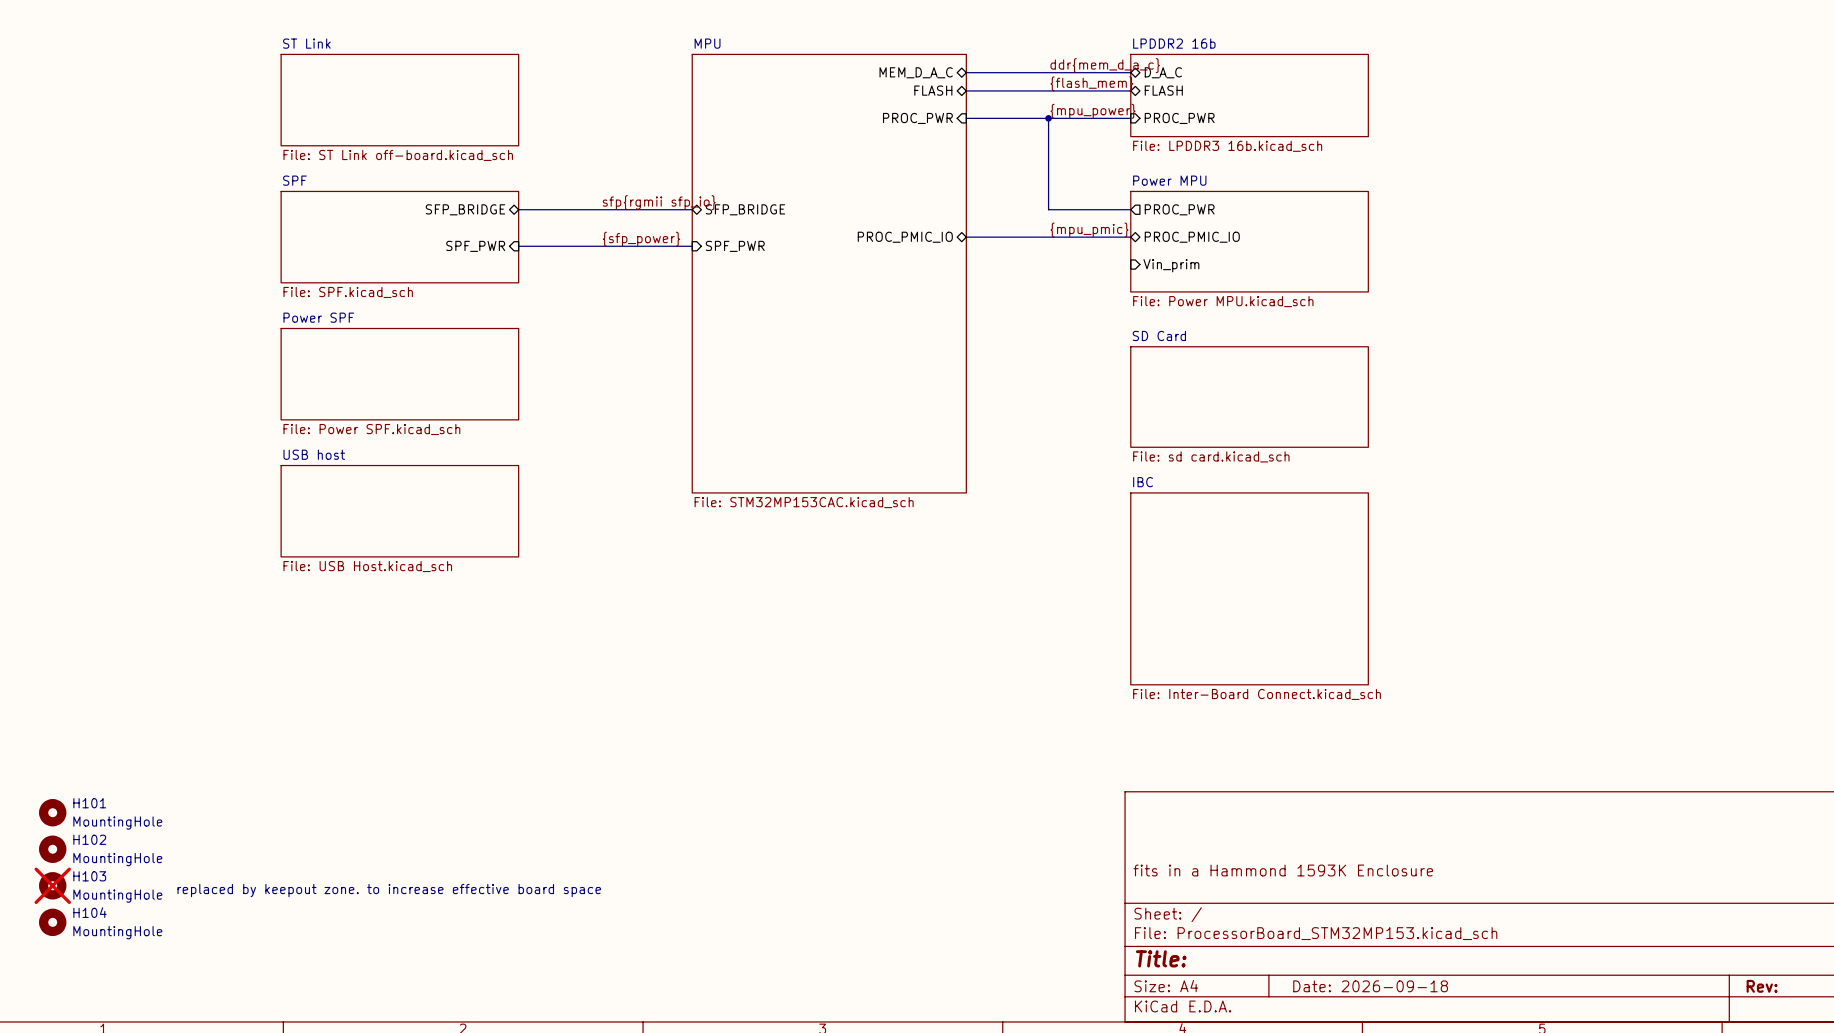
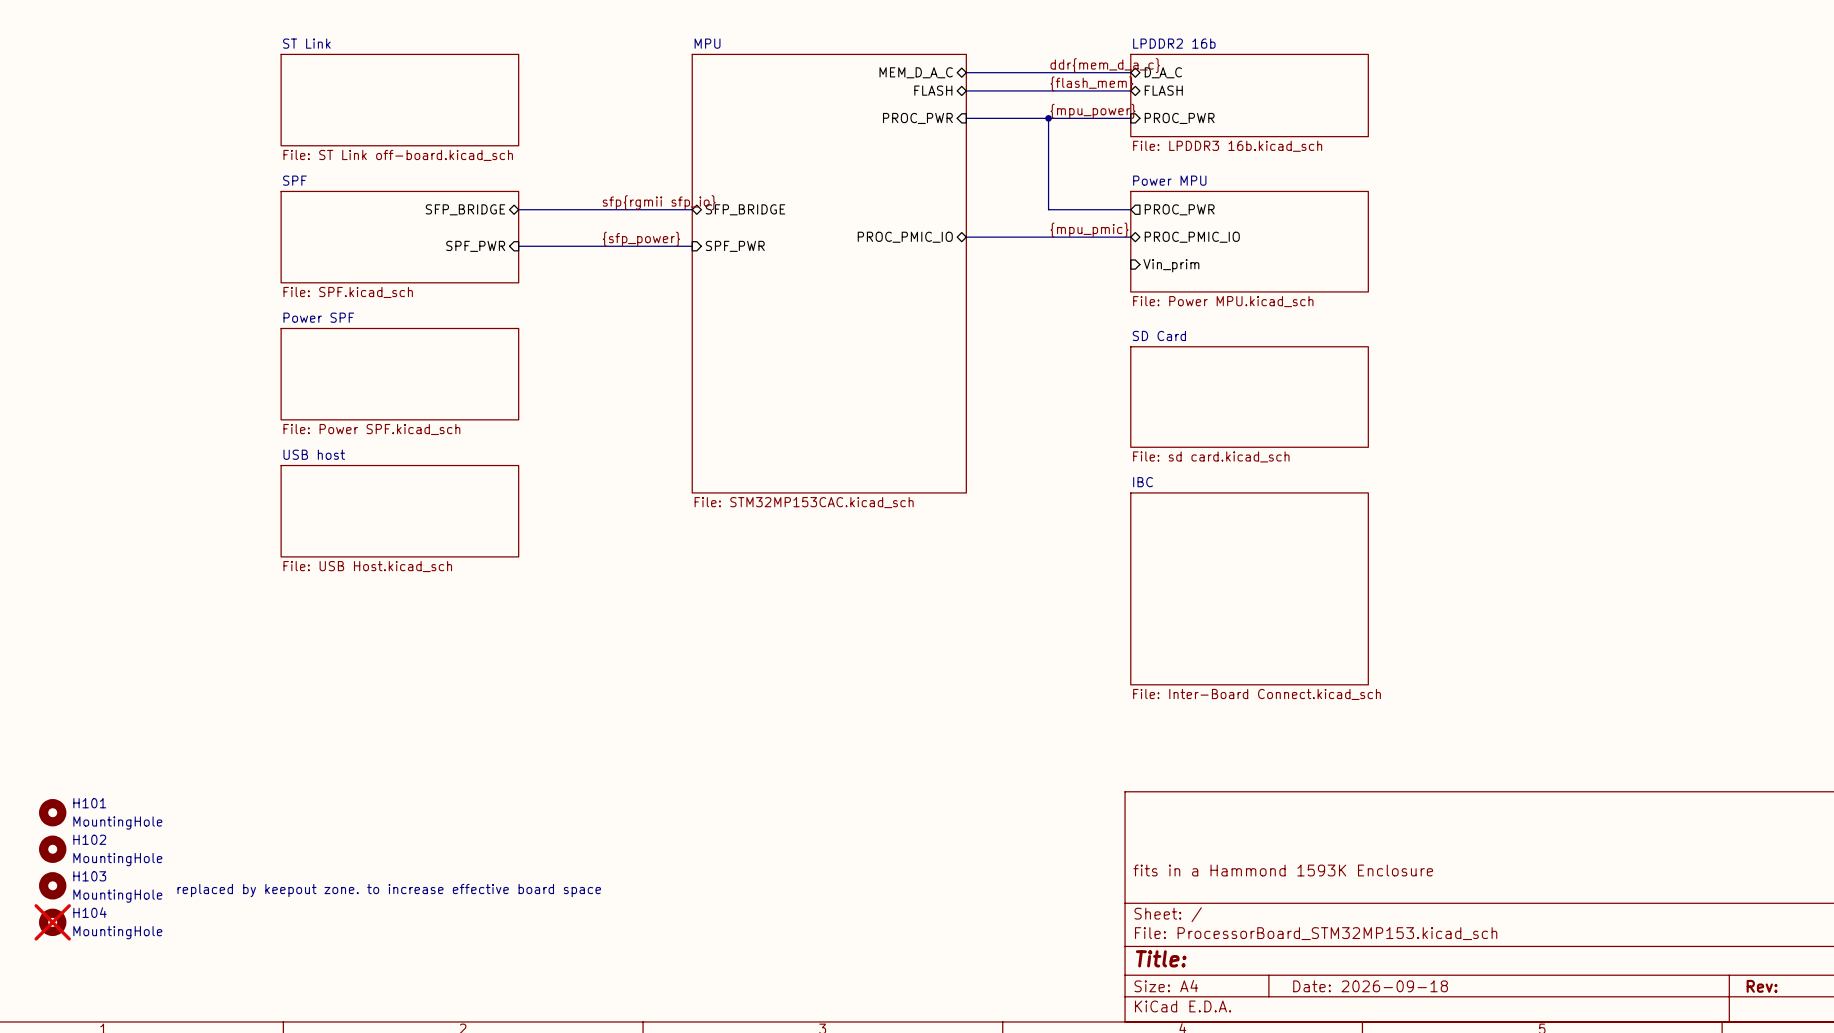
H103 do-not-place cross: (52, 885) -> none
H104 do-not-place cross: none -> (52, 922)

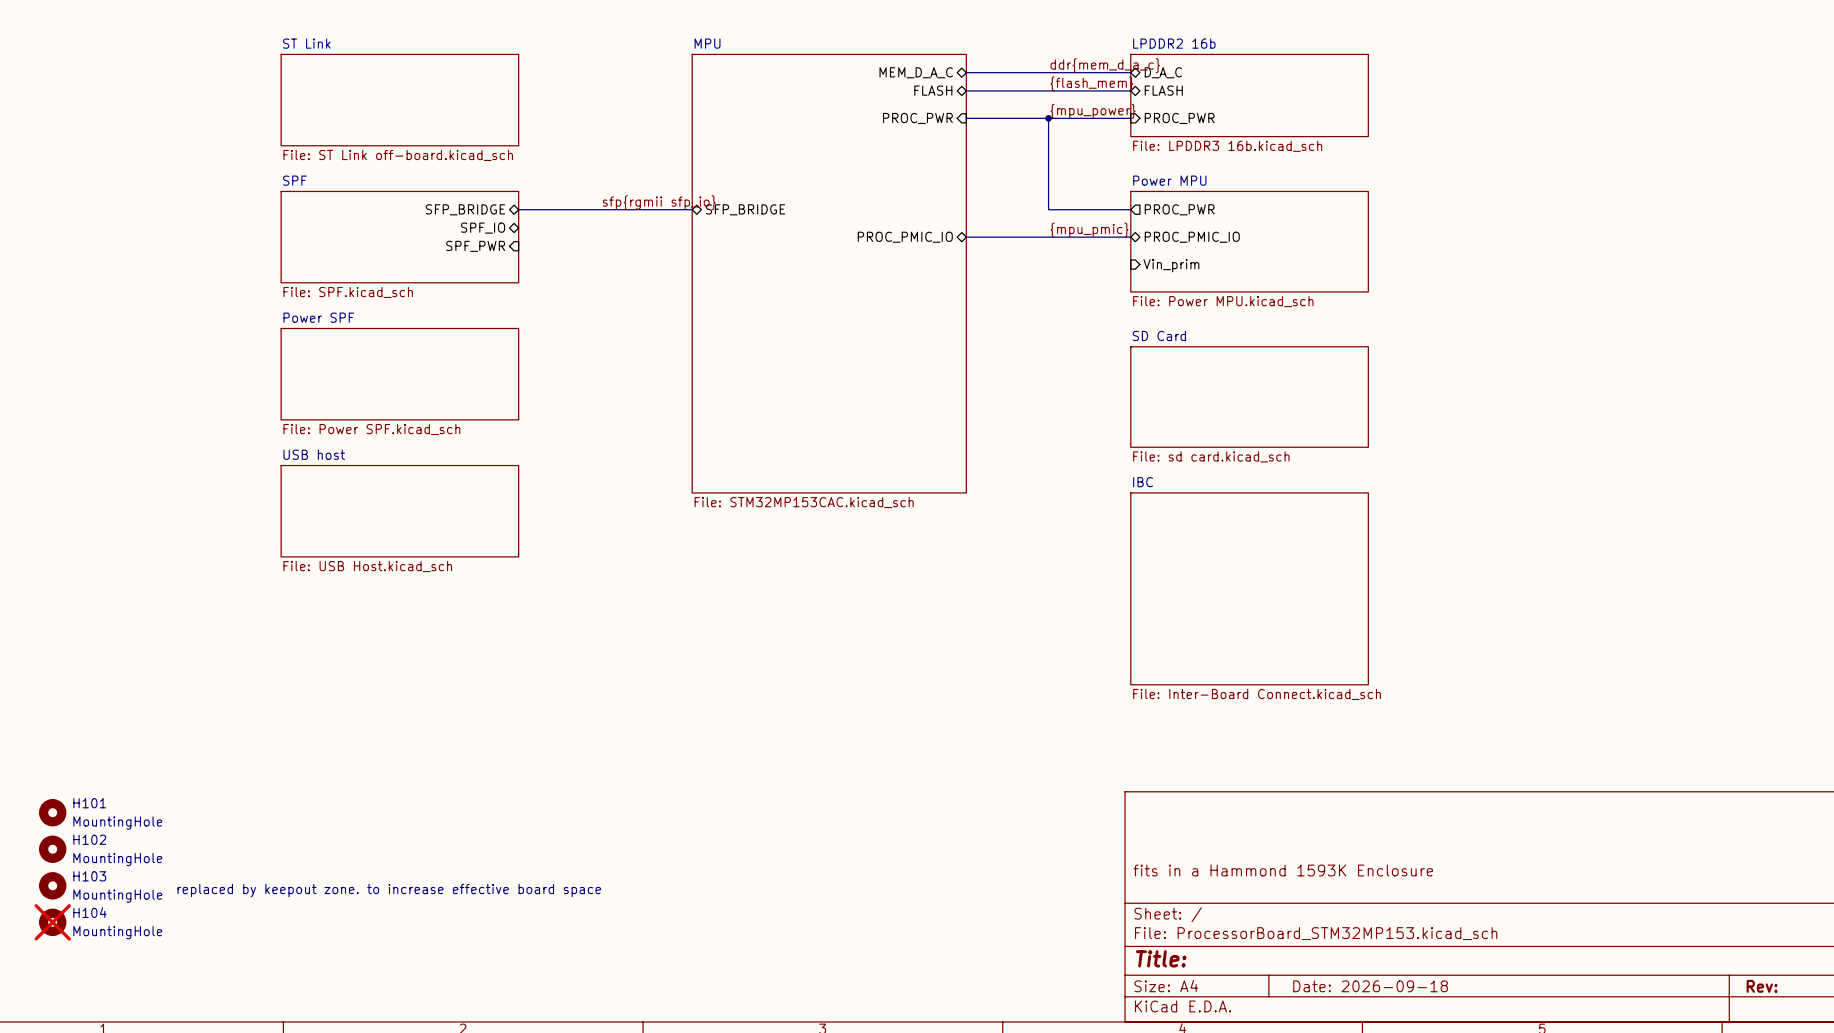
sheet pin: none -> SPF_IO (483, 228)
label: {sfp_power} (641, 239) -> none
bus: (518, 246) (692, 246) -> none
sheet pin: SPF_PWR (735, 246) -> none

